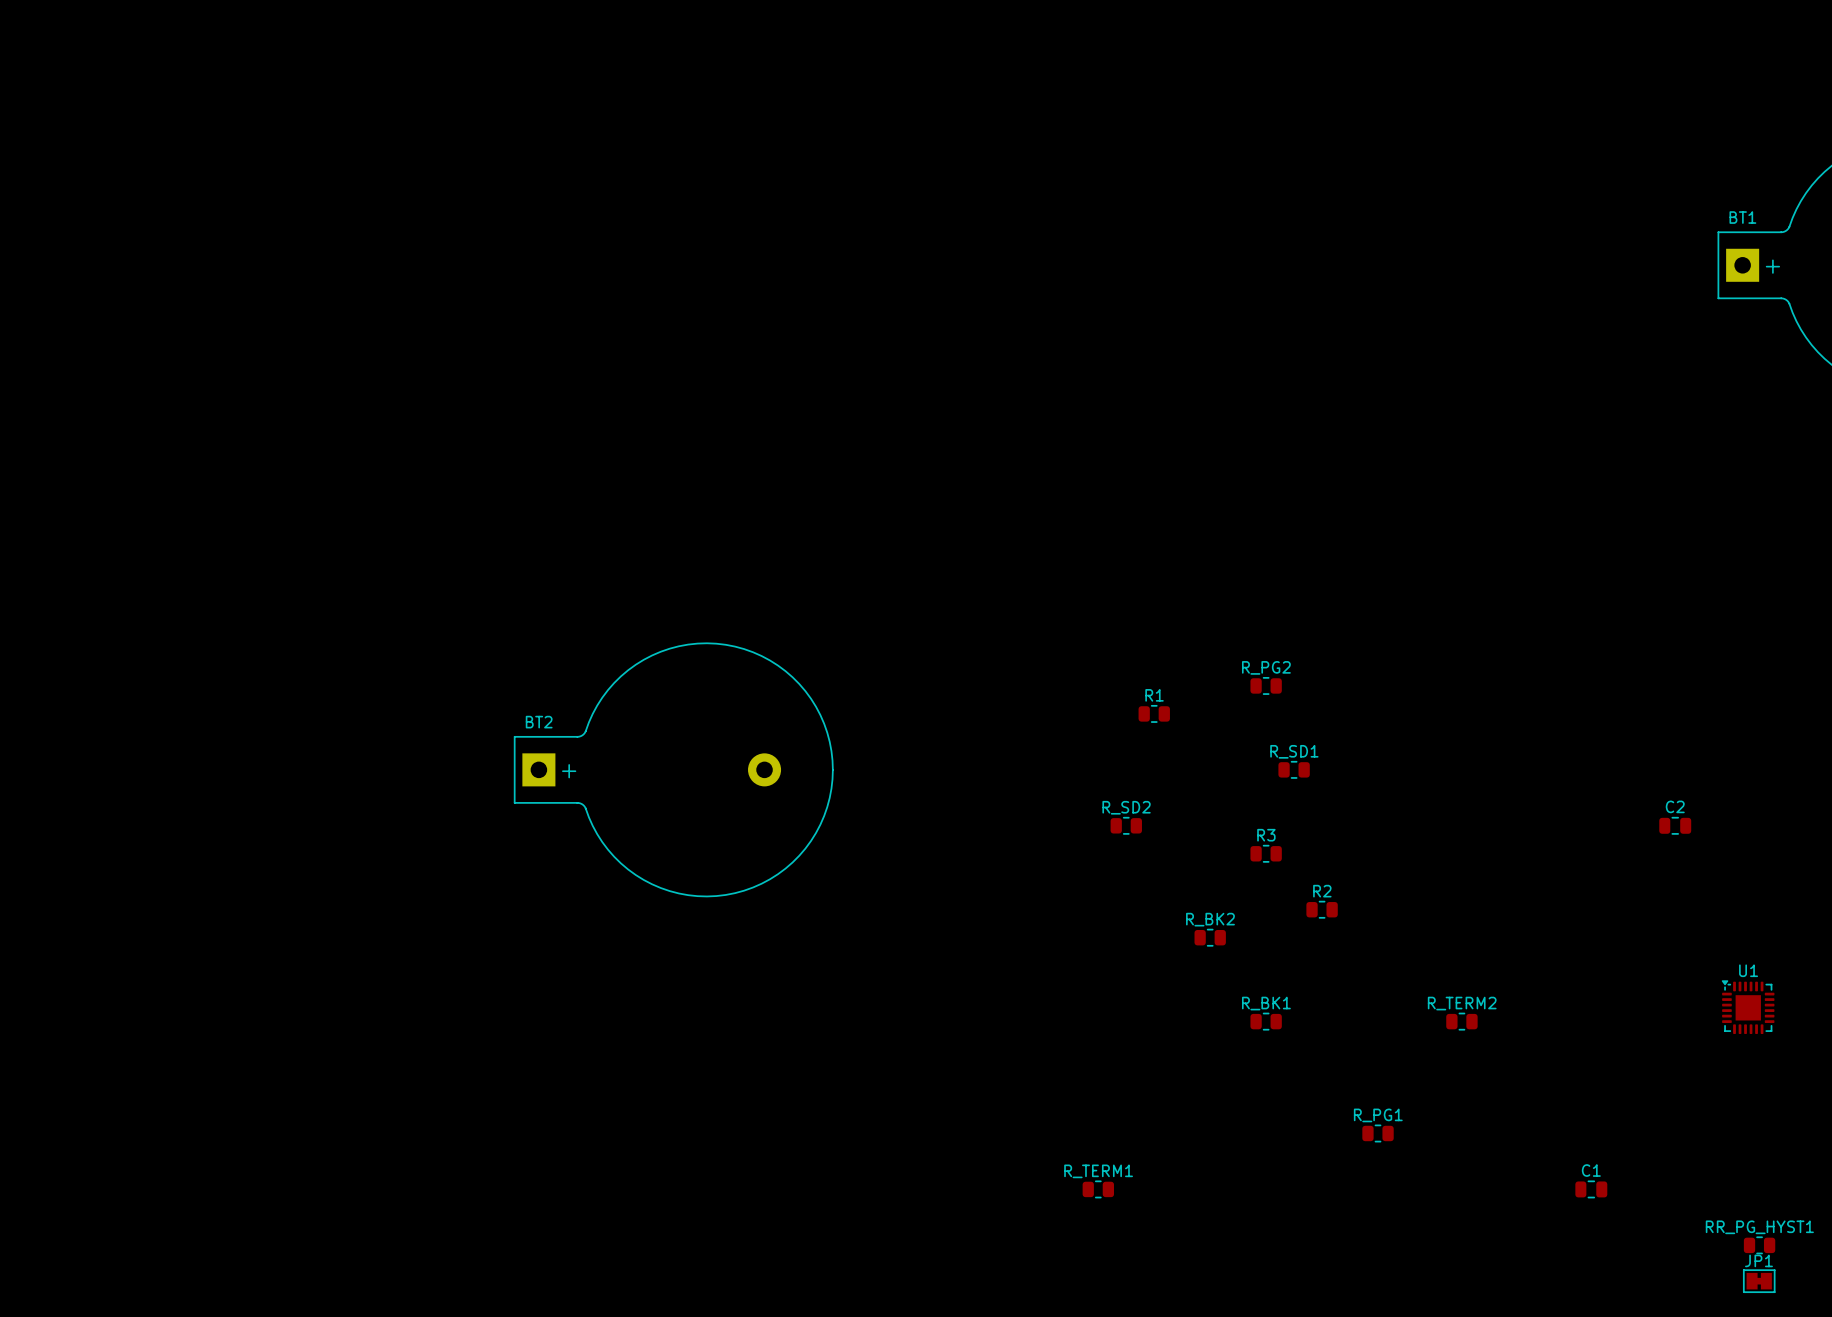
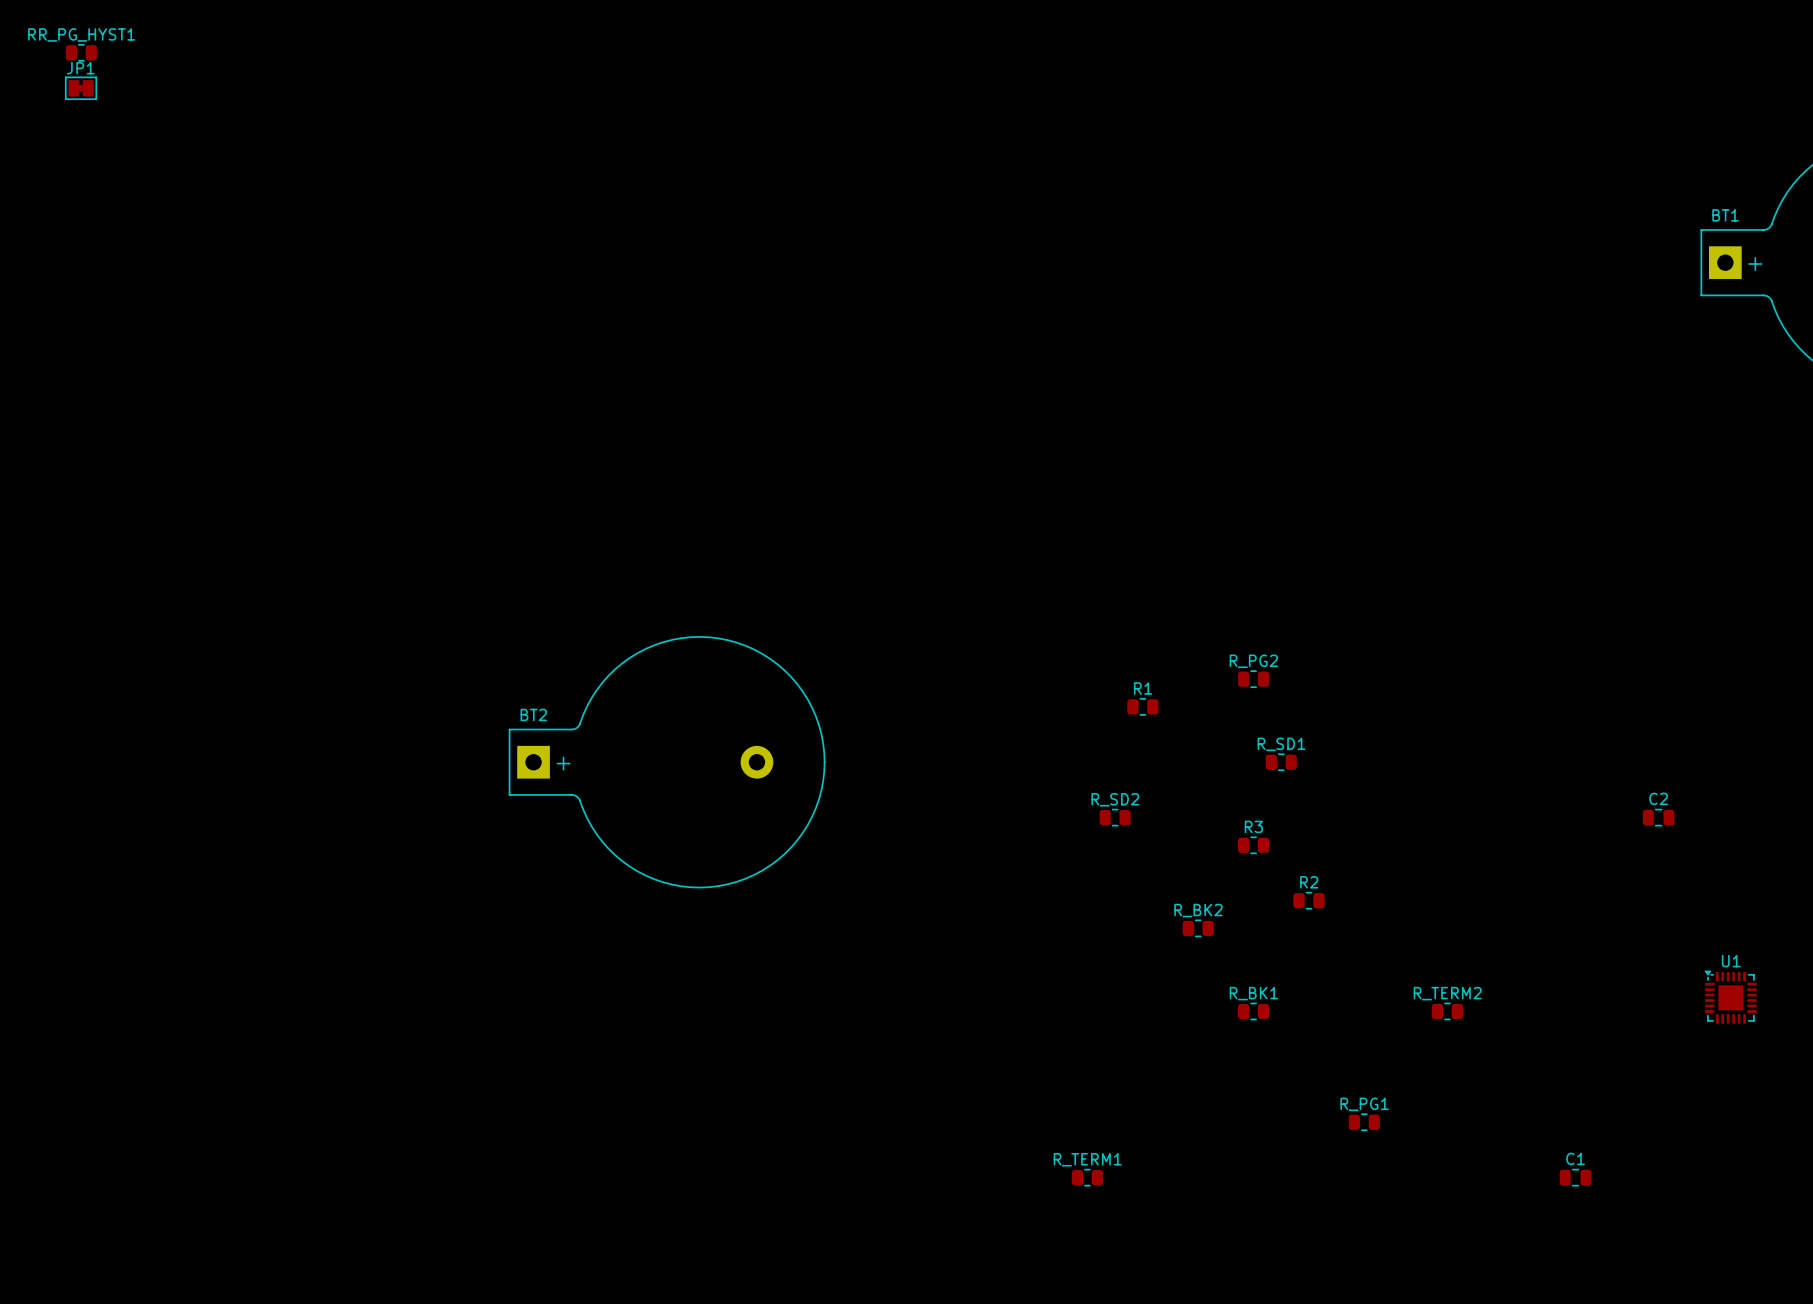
RR_PG_HYST1 position: (1759, 1245) -> (81, 52)
JP1 position: (1759, 1281) -> (81, 88)

